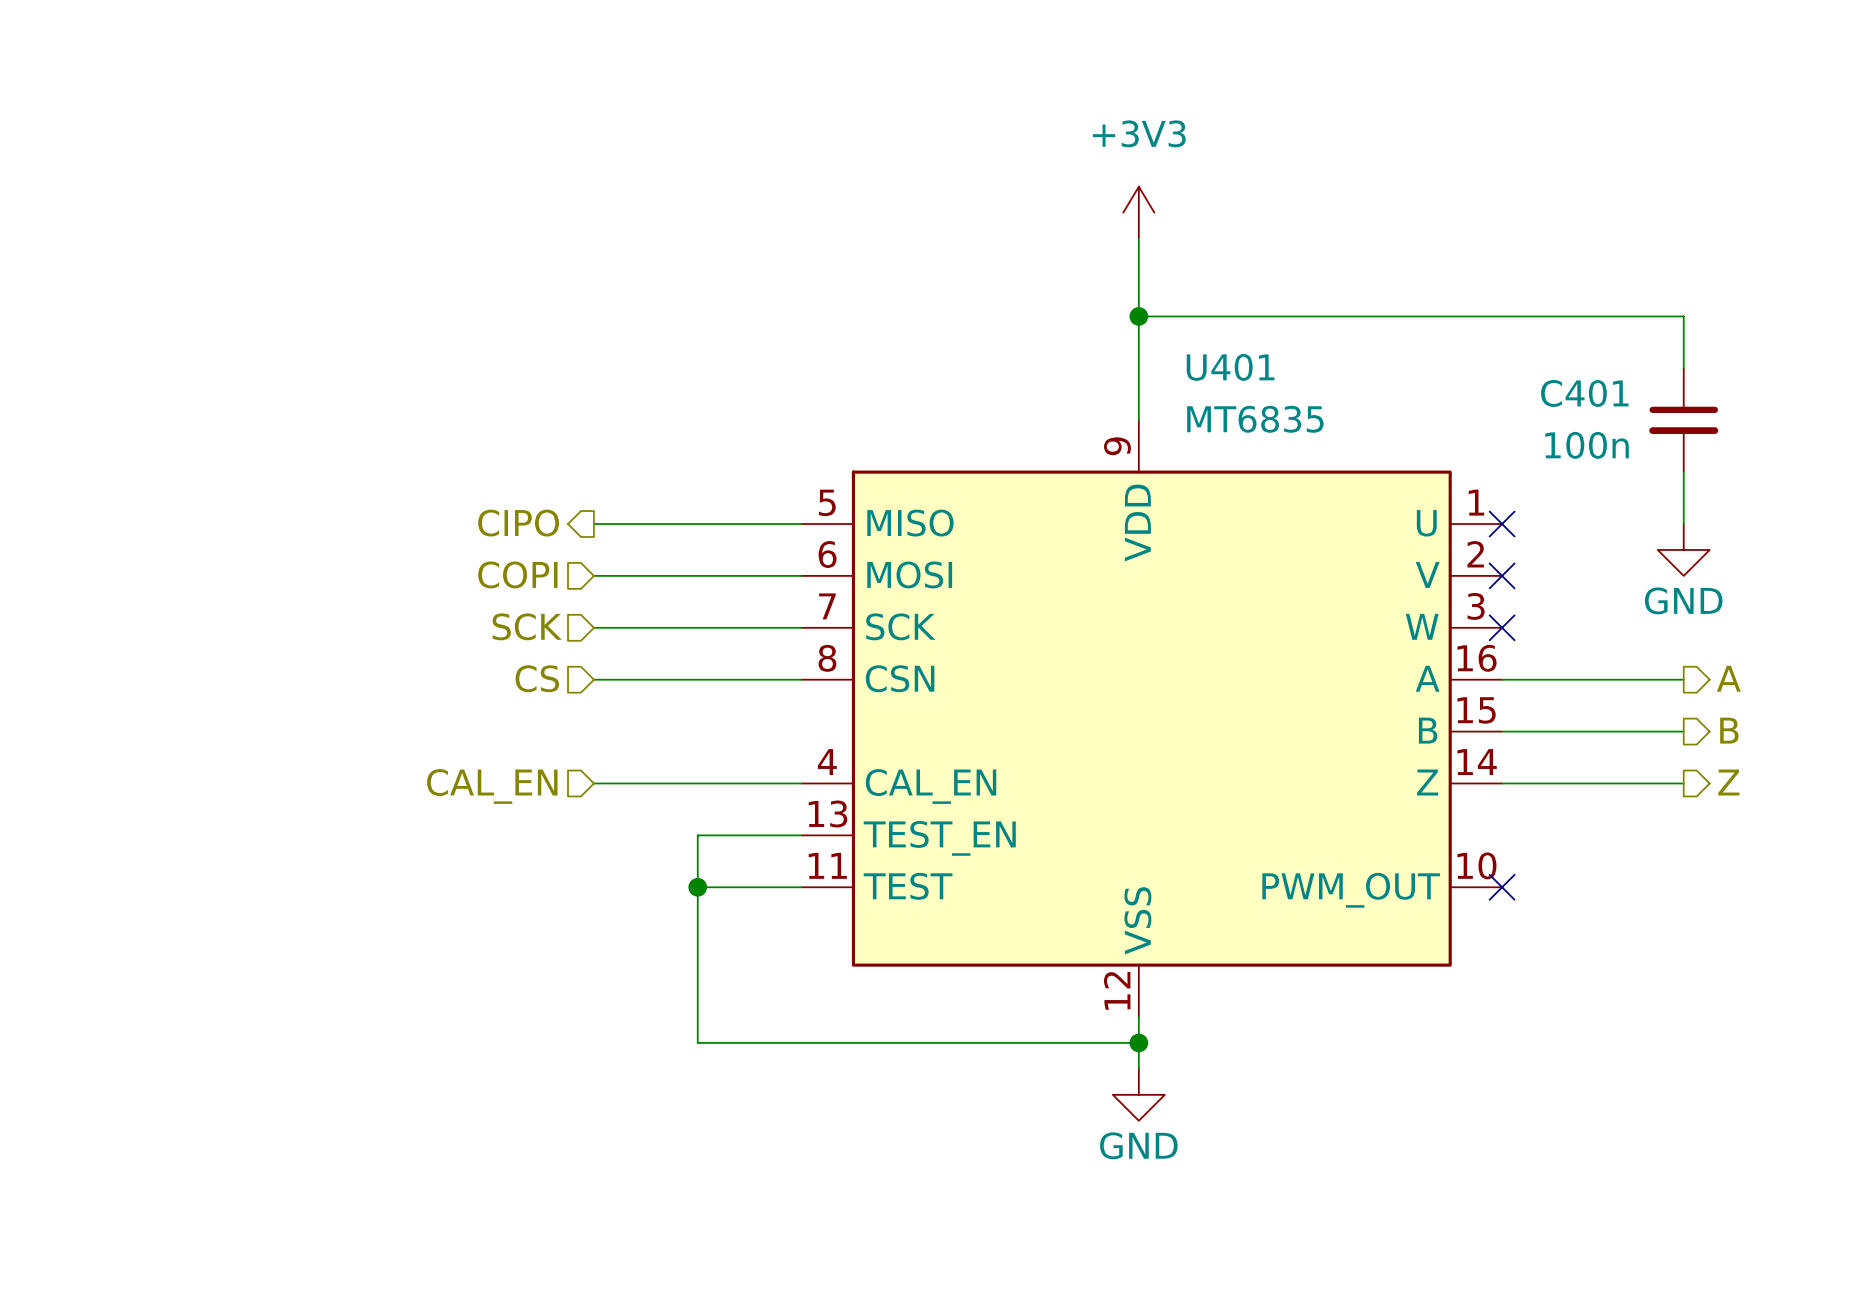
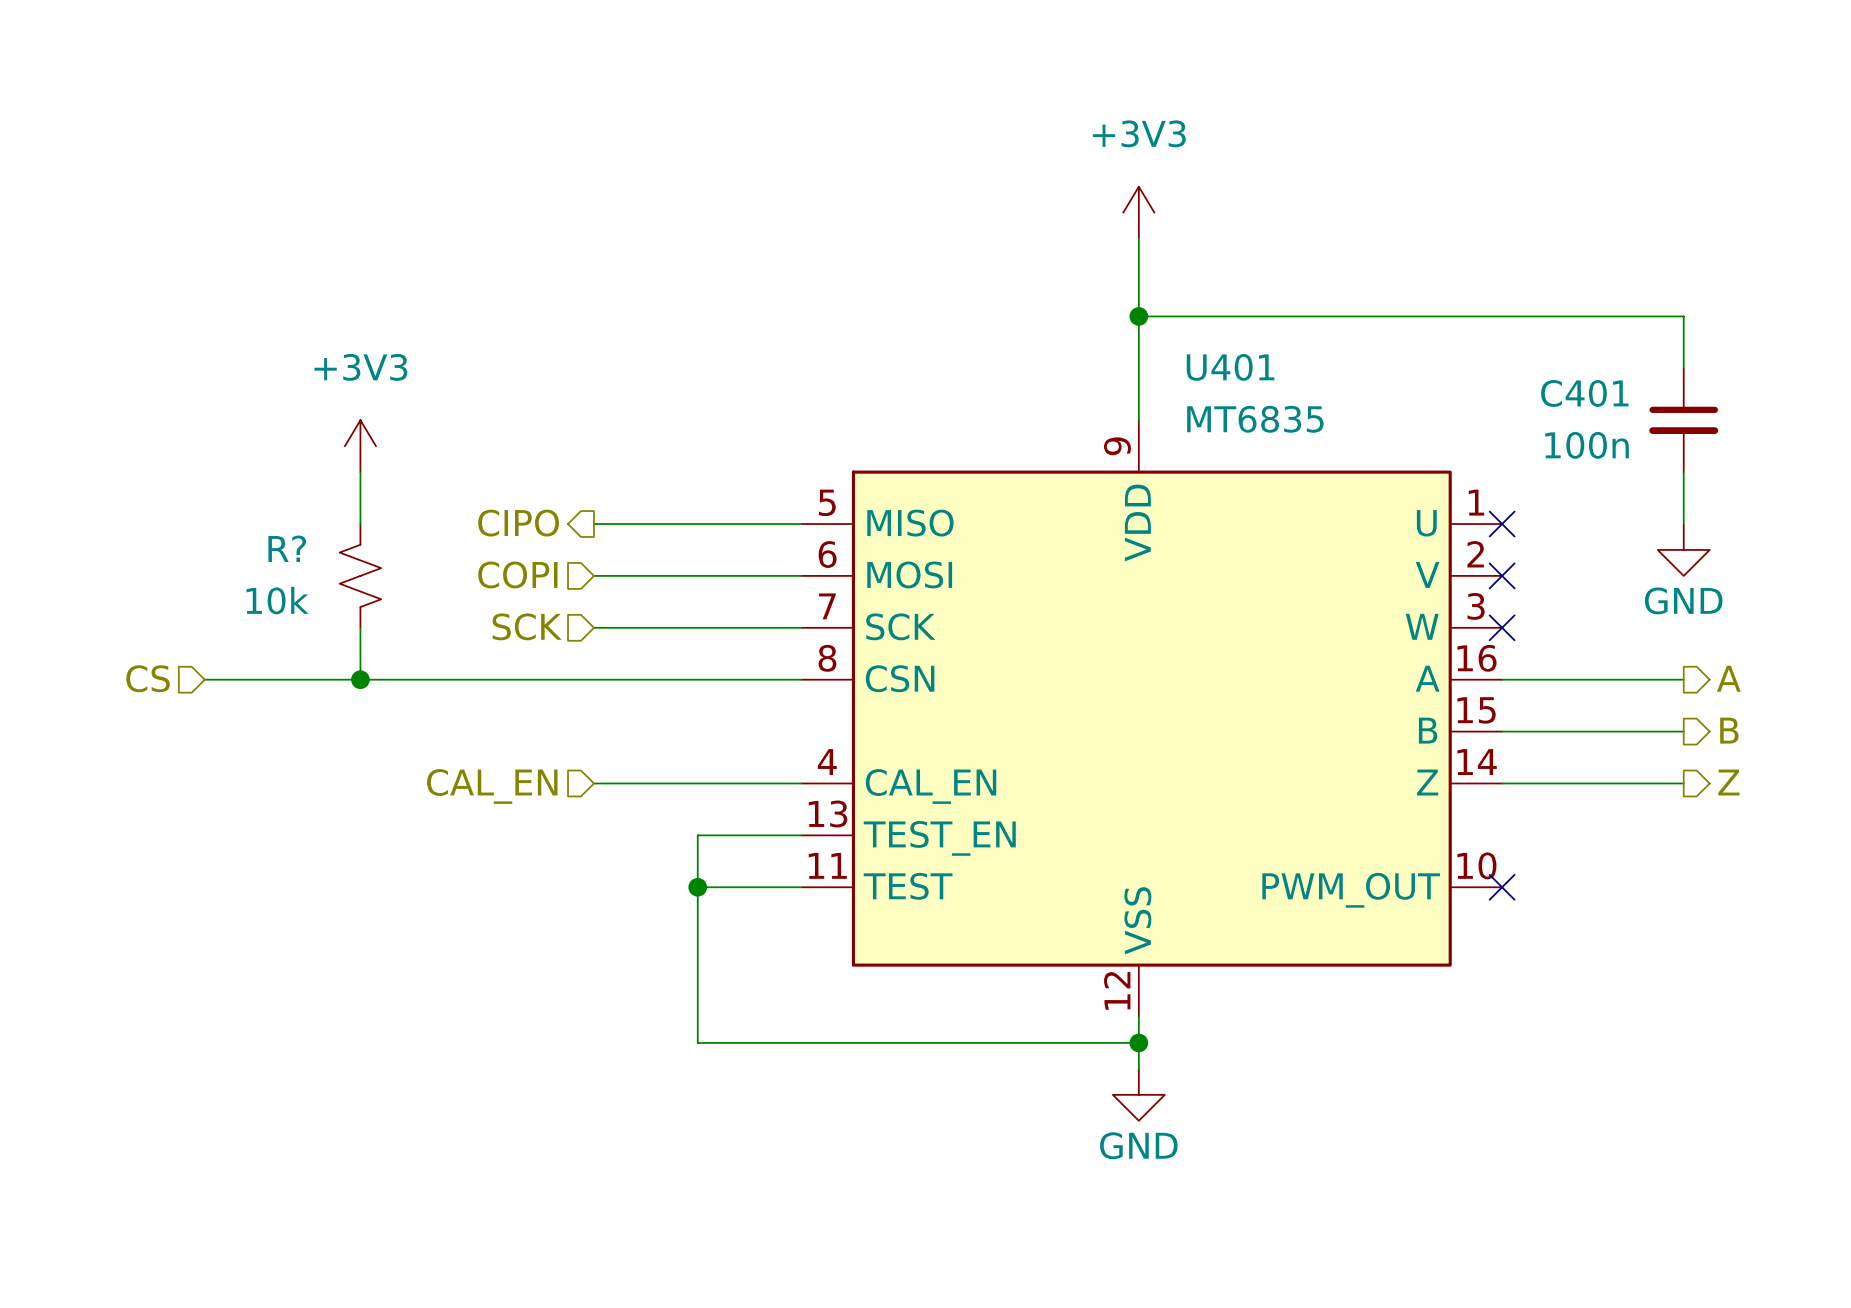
power symbol: none -> +3V3 (360, 446)
wire: none -> (360, 472) (360, 524)
R?: none -> 10k (360, 575)
wire: none -> (360, 627) (360, 679)
hierarchical label position: CS (537, 678) -> CS (148, 678)
wire: none -> (204, 679) (593, 679)
junction: none -> (360, 679)

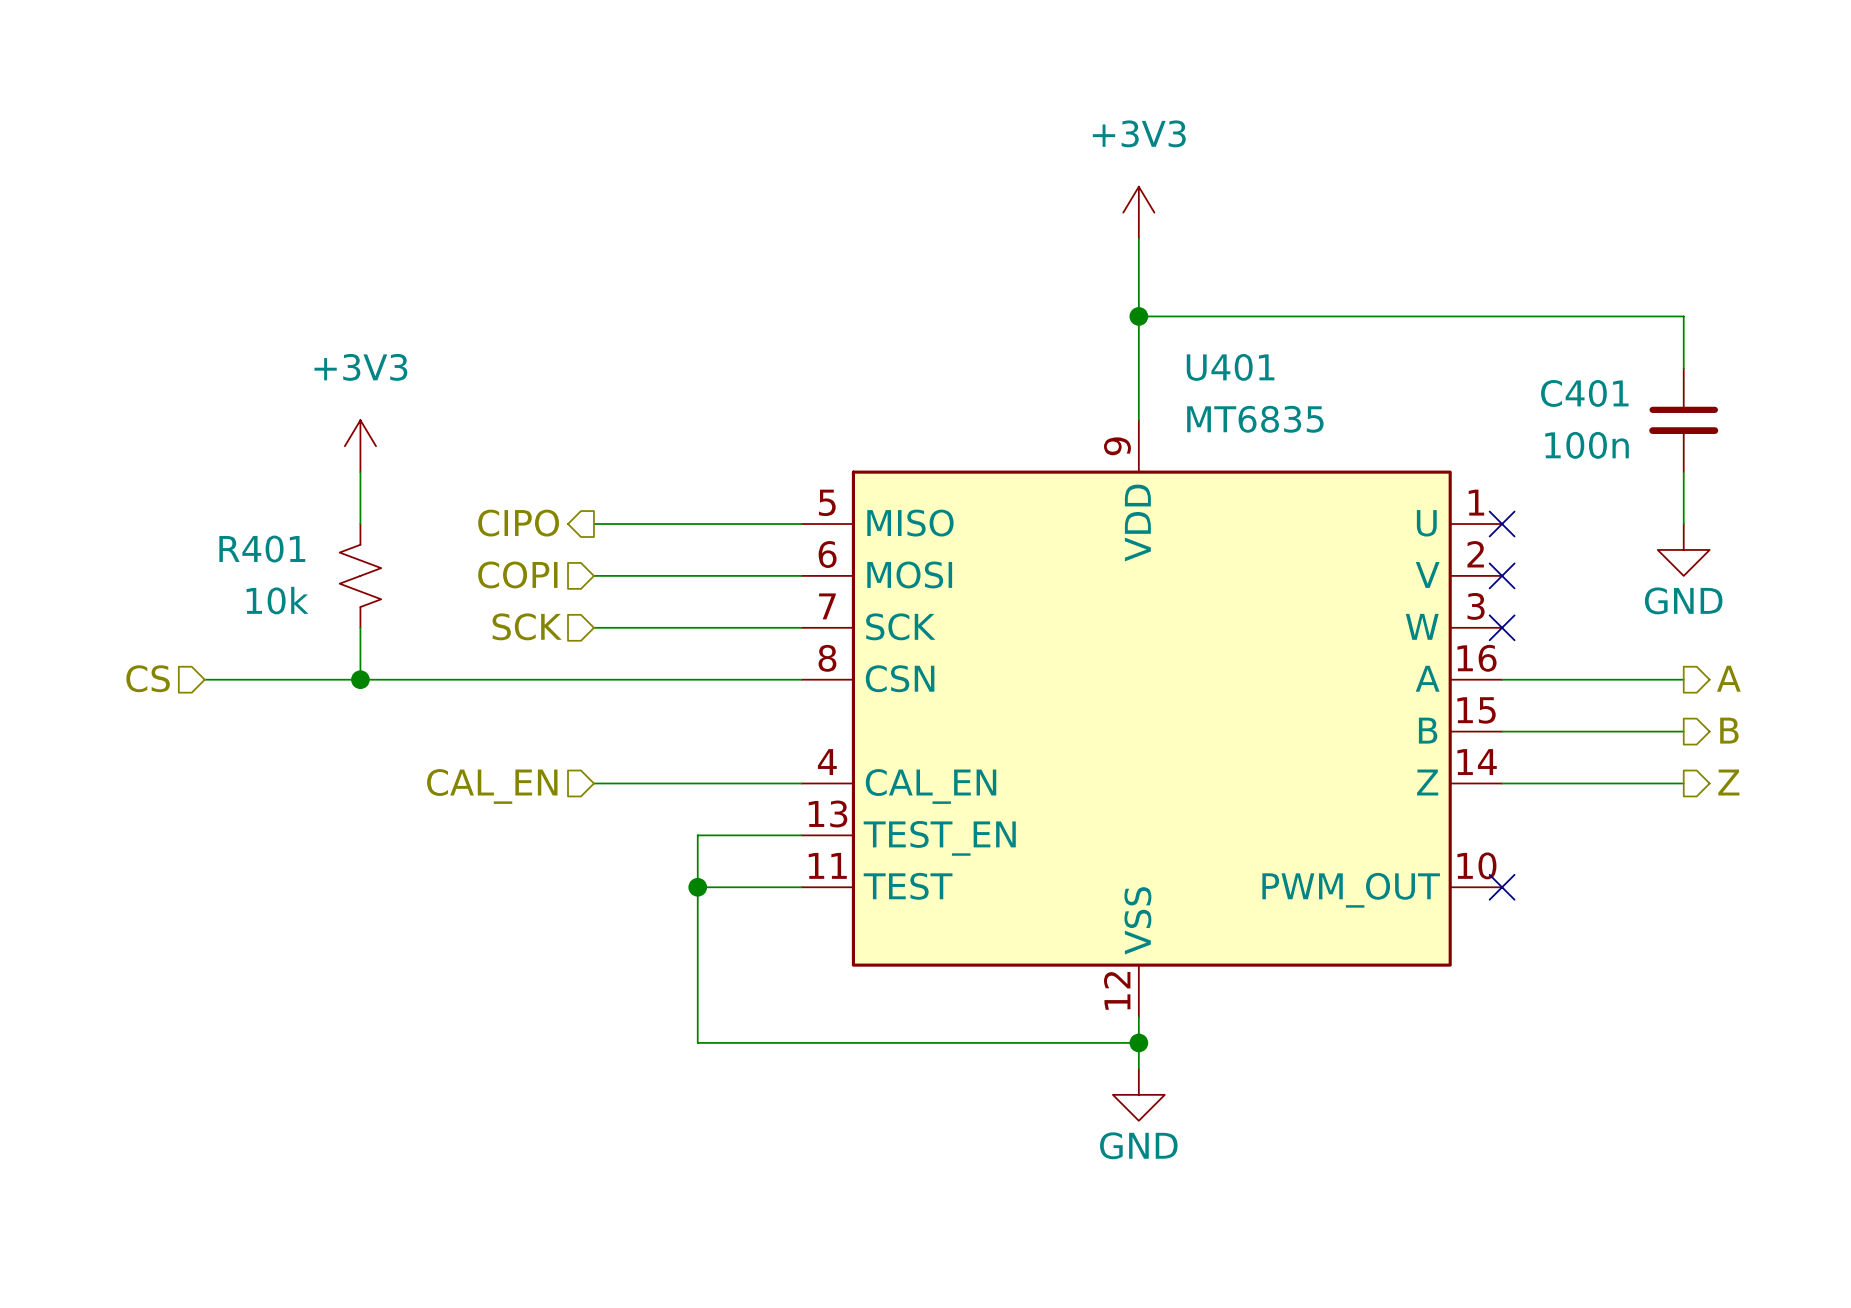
R? name: R? (287, 548) -> R401 (262, 549)

